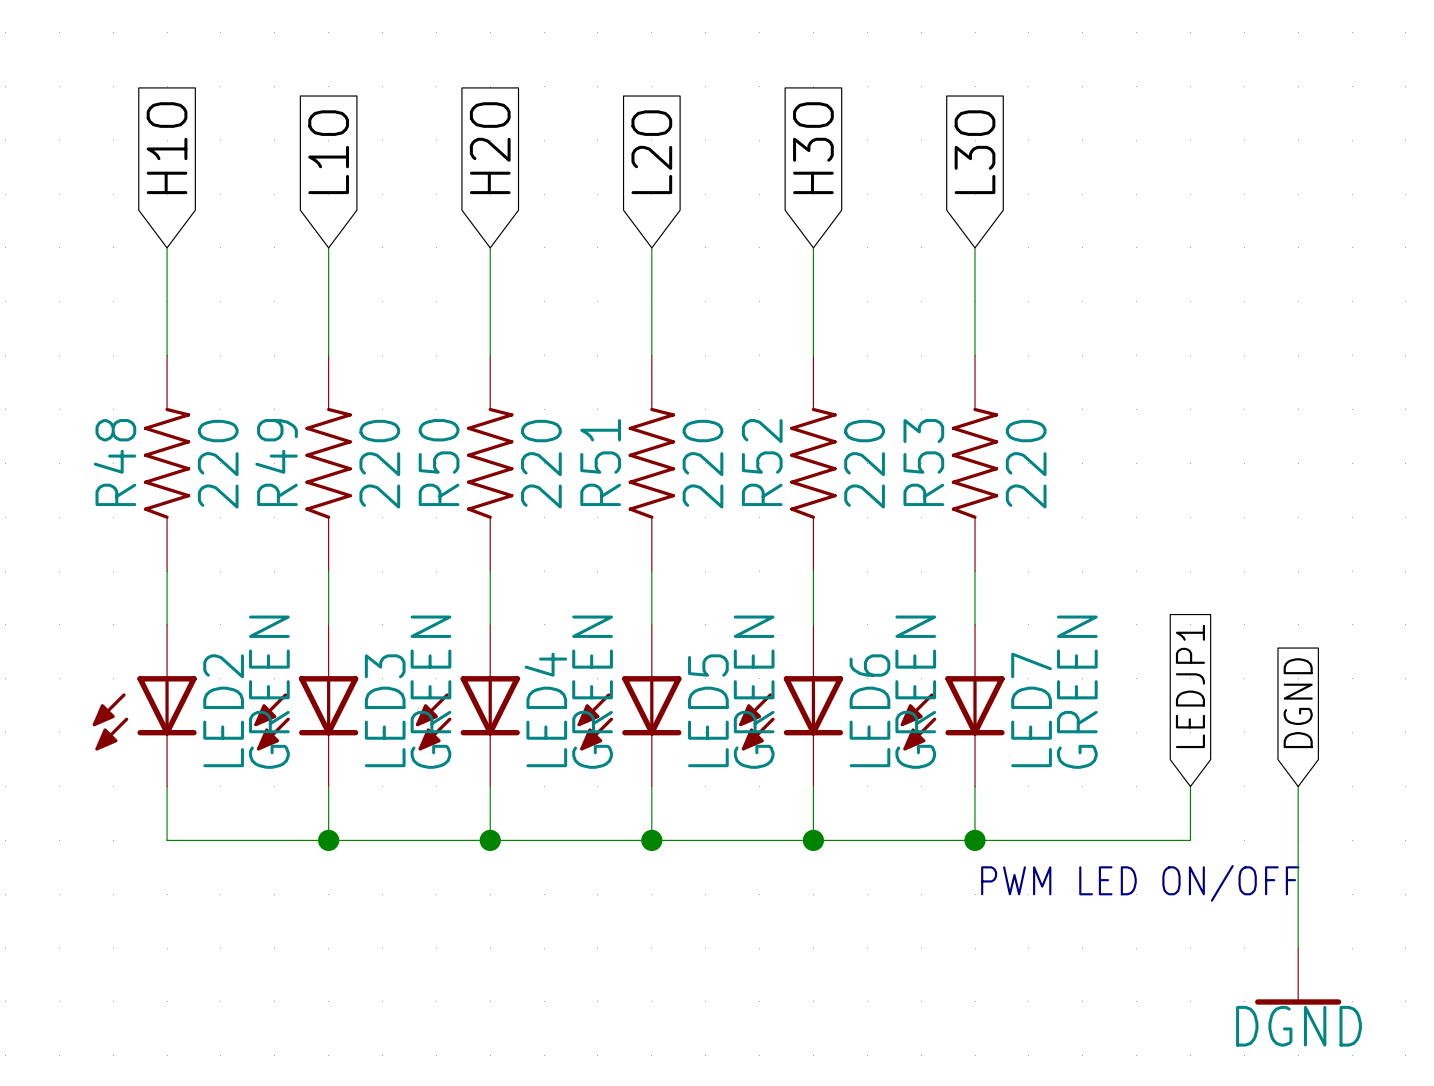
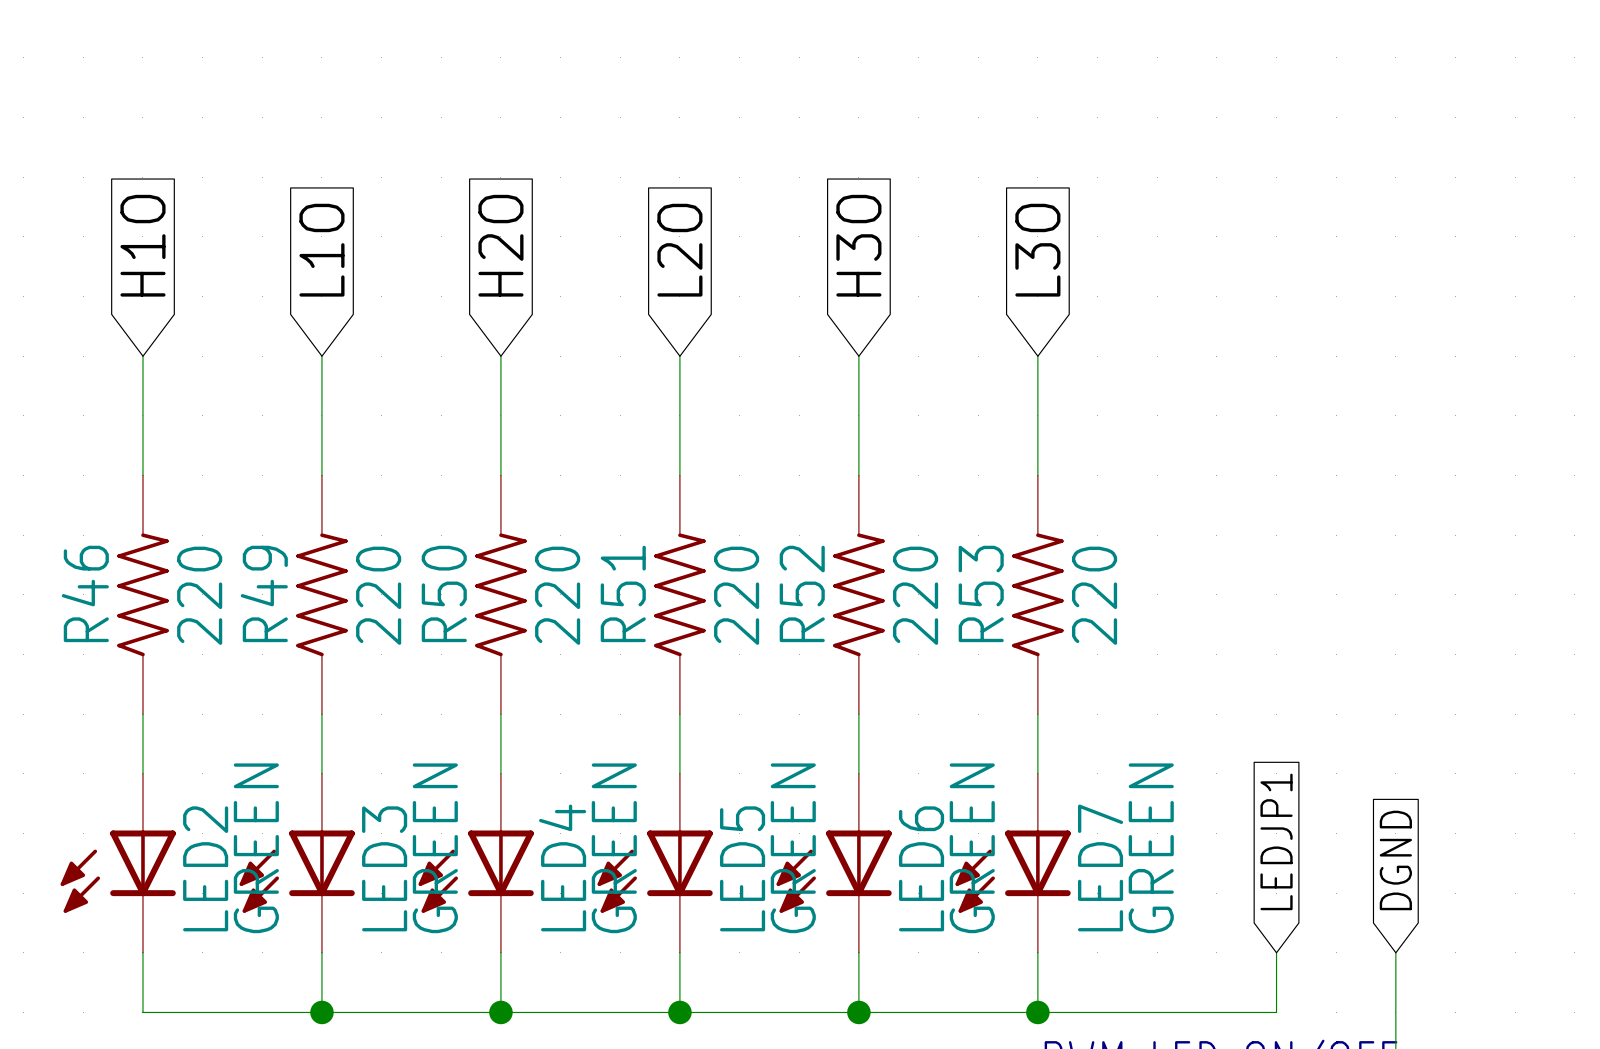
R48 name: R48 (114, 462) -> R46 (85, 593)

